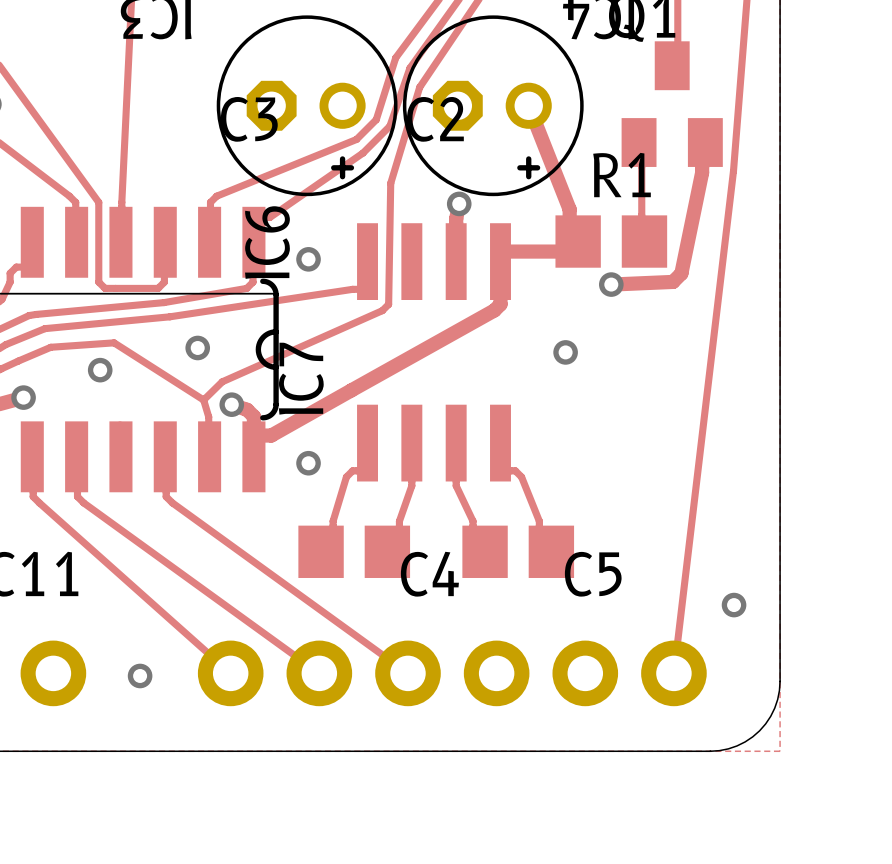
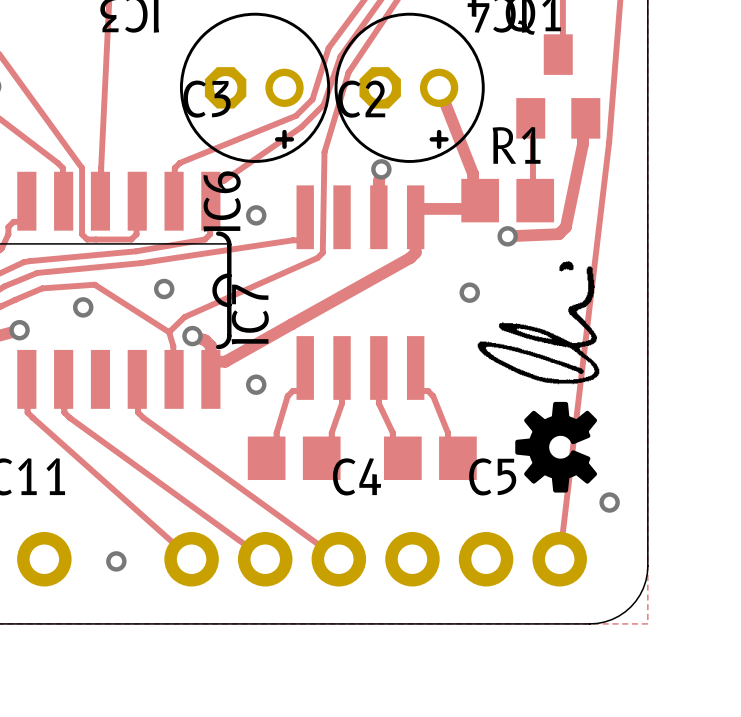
drawing: none -> [477, 261, 600, 493]

